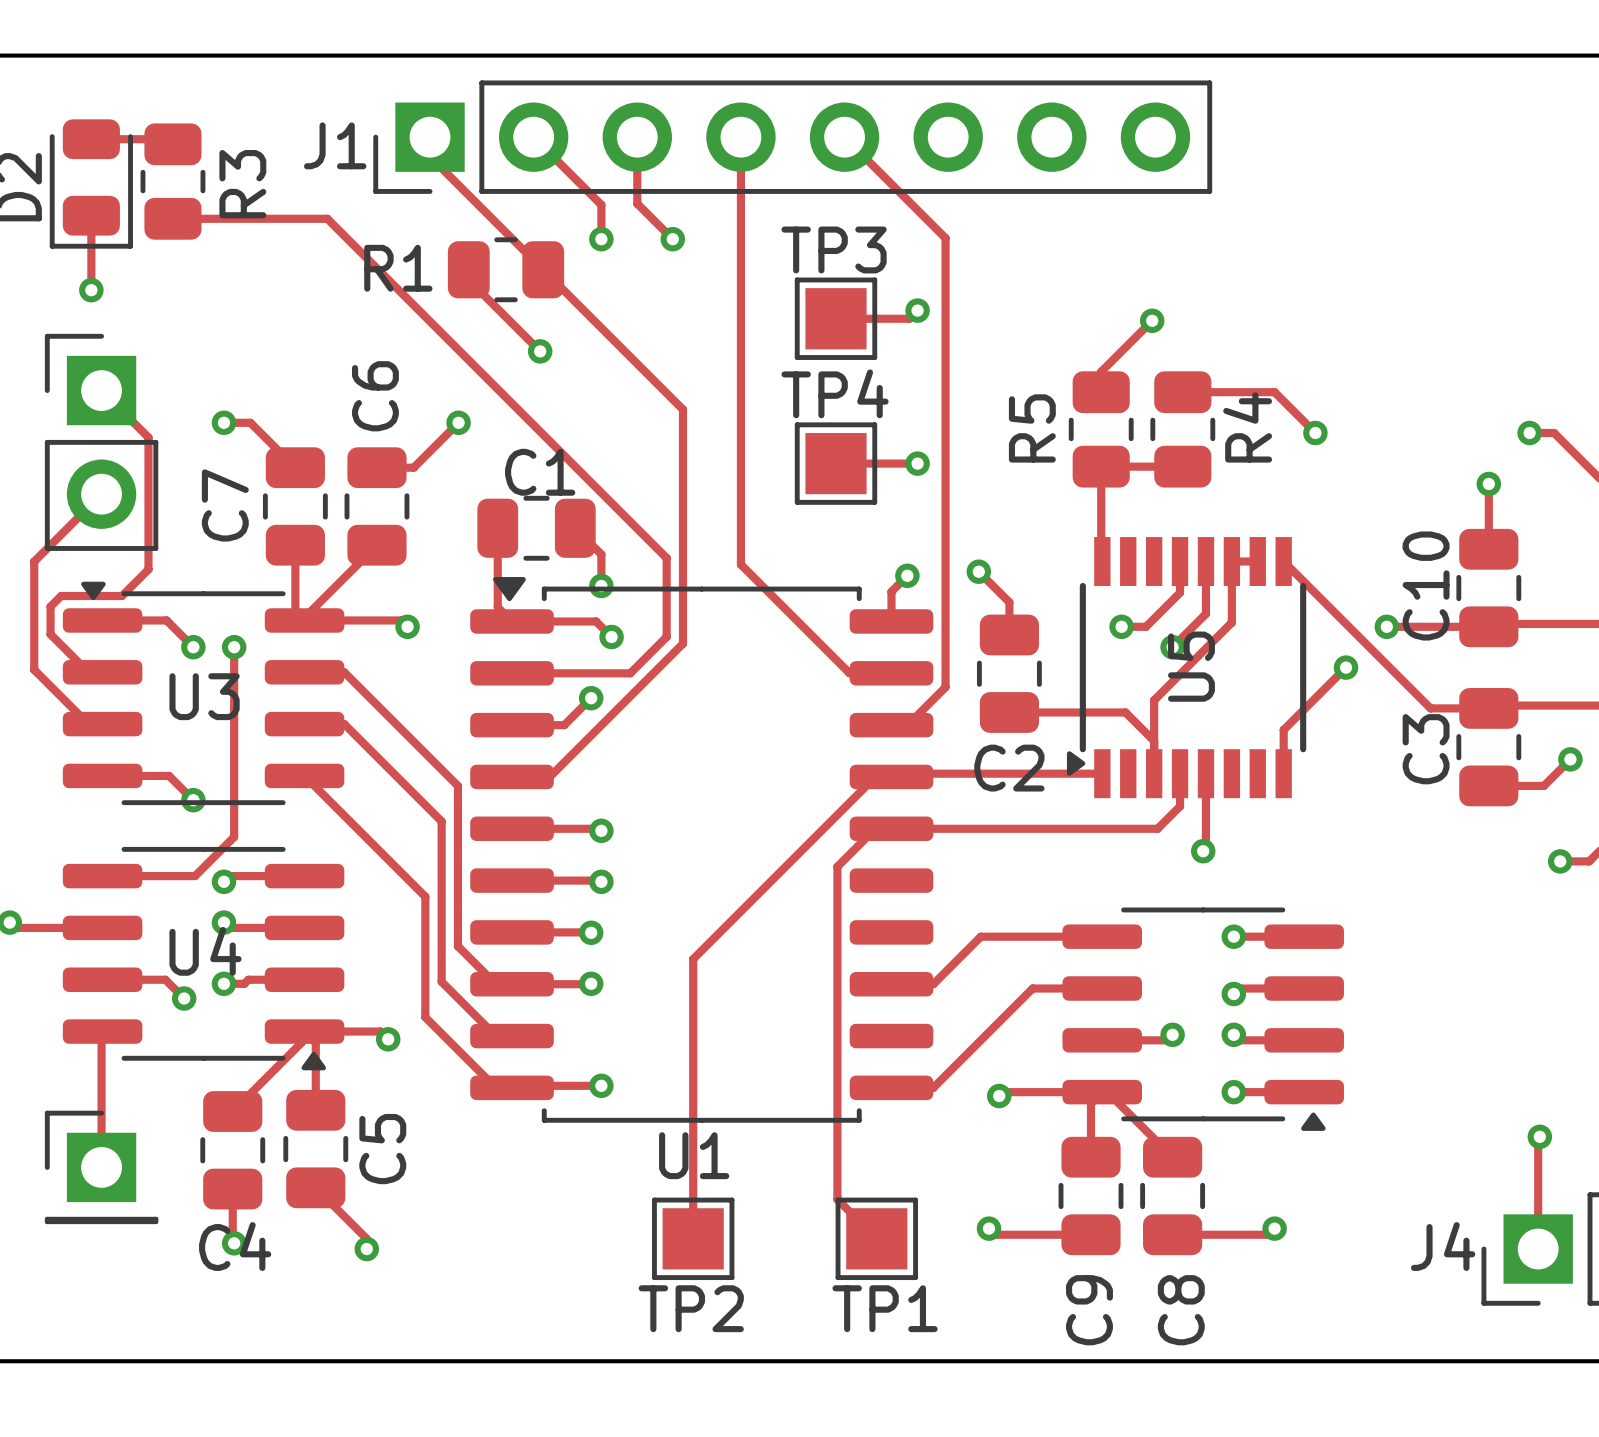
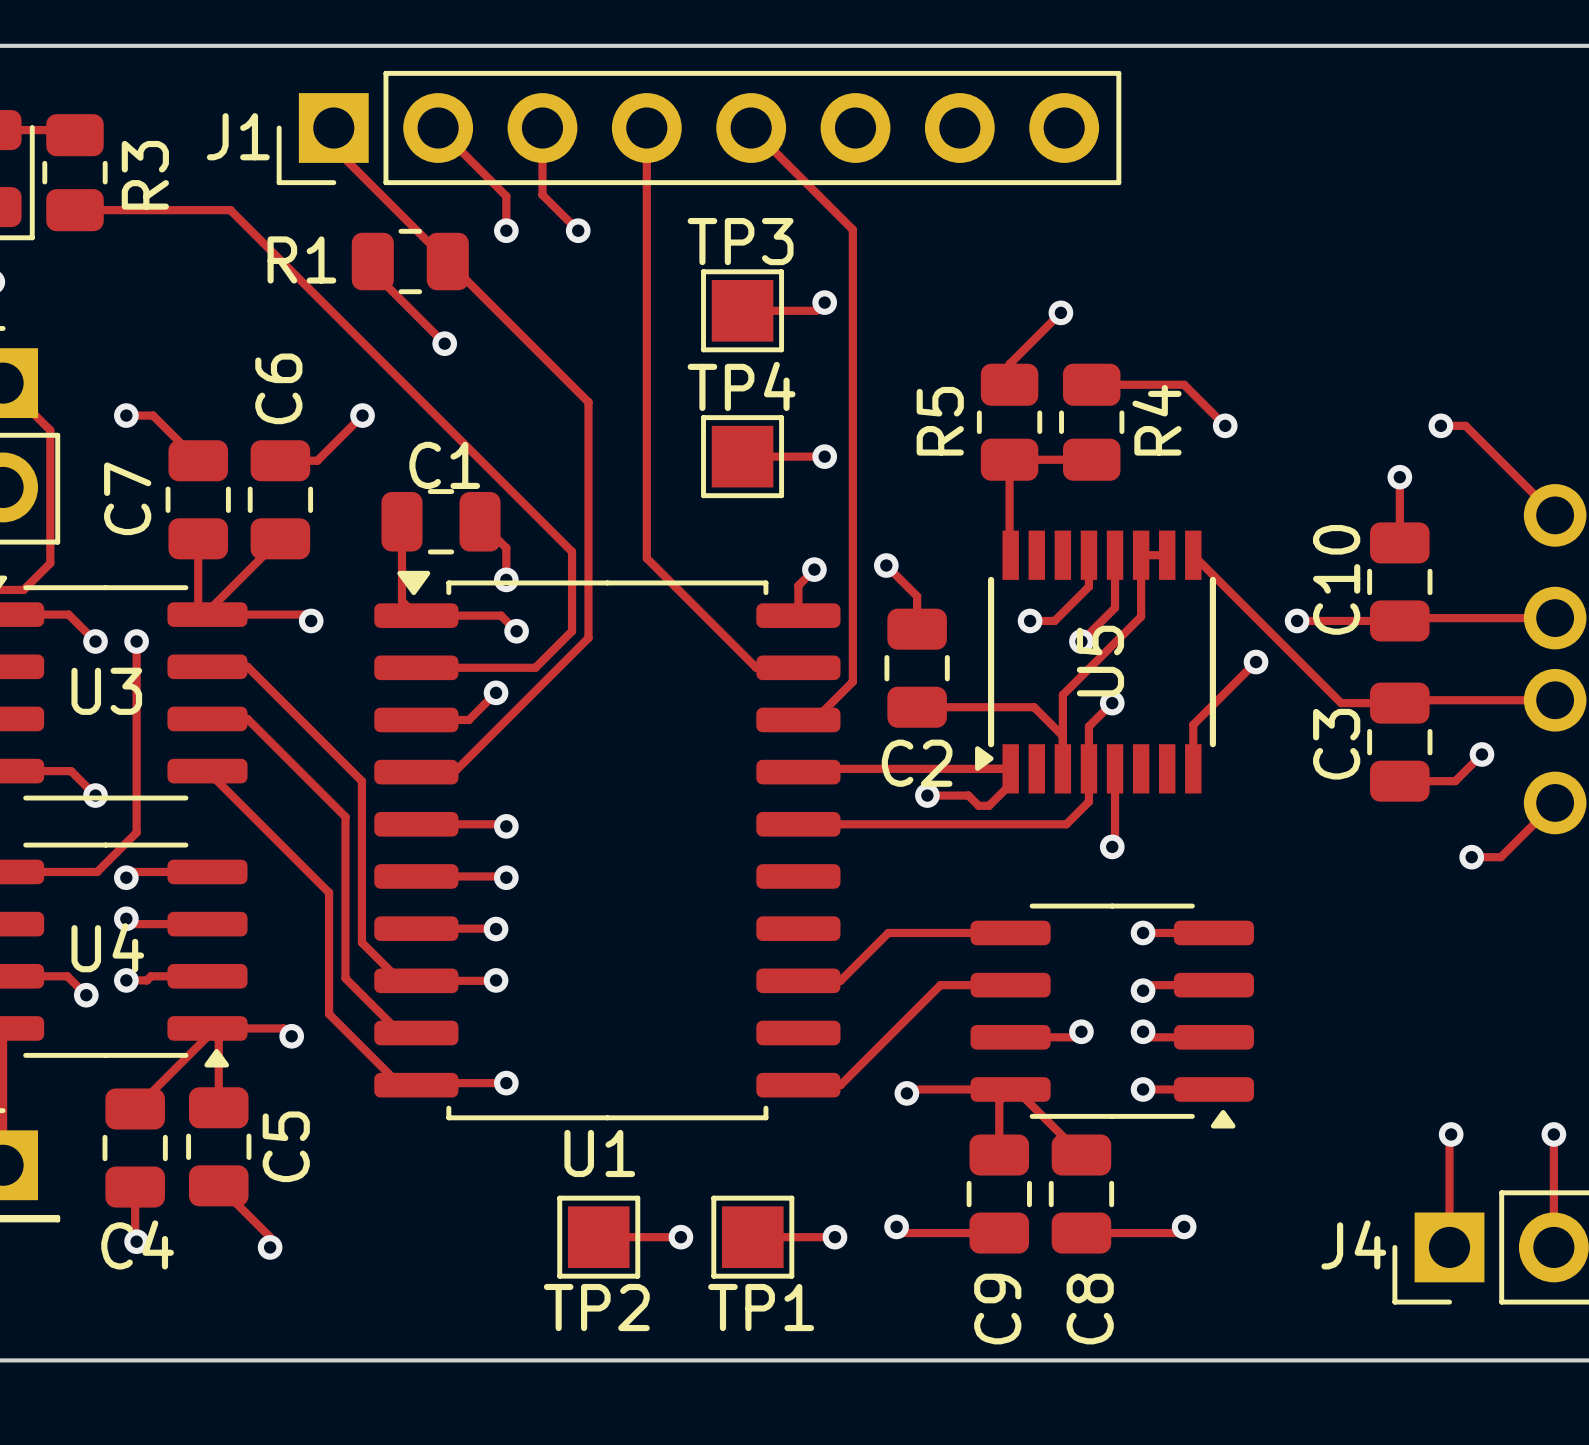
track: none -> (1112, 703) (1088, 726) (1088, 768)
via: none -> (1112, 703)
track: none -> (1010, 768) (1010, 784) (989, 805) (978, 805) (968, 795) (927, 795)
track: (891, 776) (875, 776) (693, 959) (693, 1238) -> (680, 1237) (598, 1237)
via: none -> (927, 795)
track: (891, 828) (875, 828) (837, 866) (837, 1199) (876, 1238) -> none
via: none -> (680, 1237)
track: none -> (752, 1237) (834, 1237)
TP1 position: (876, 1238) -> (752, 1237)
via: none -> (834, 1237)

